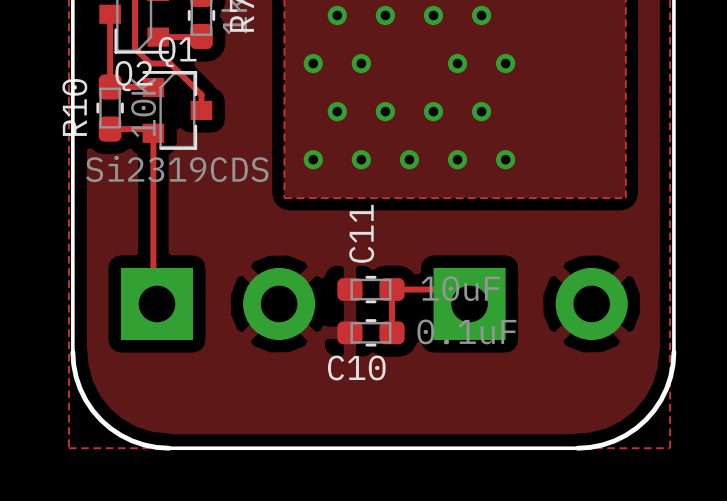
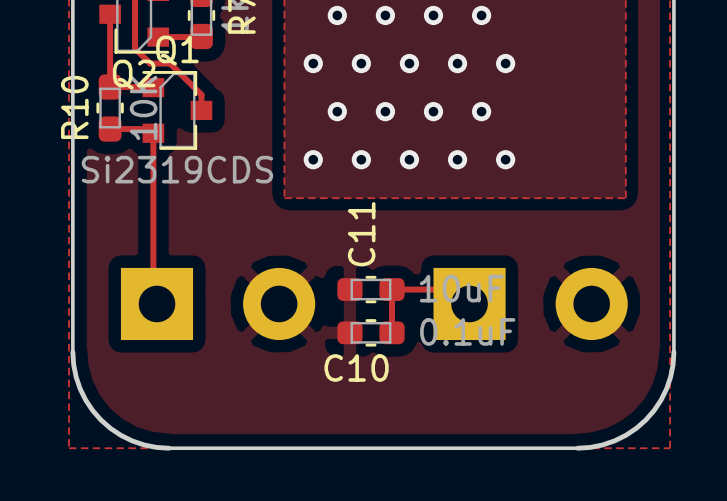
via: none -> (409, 63)

